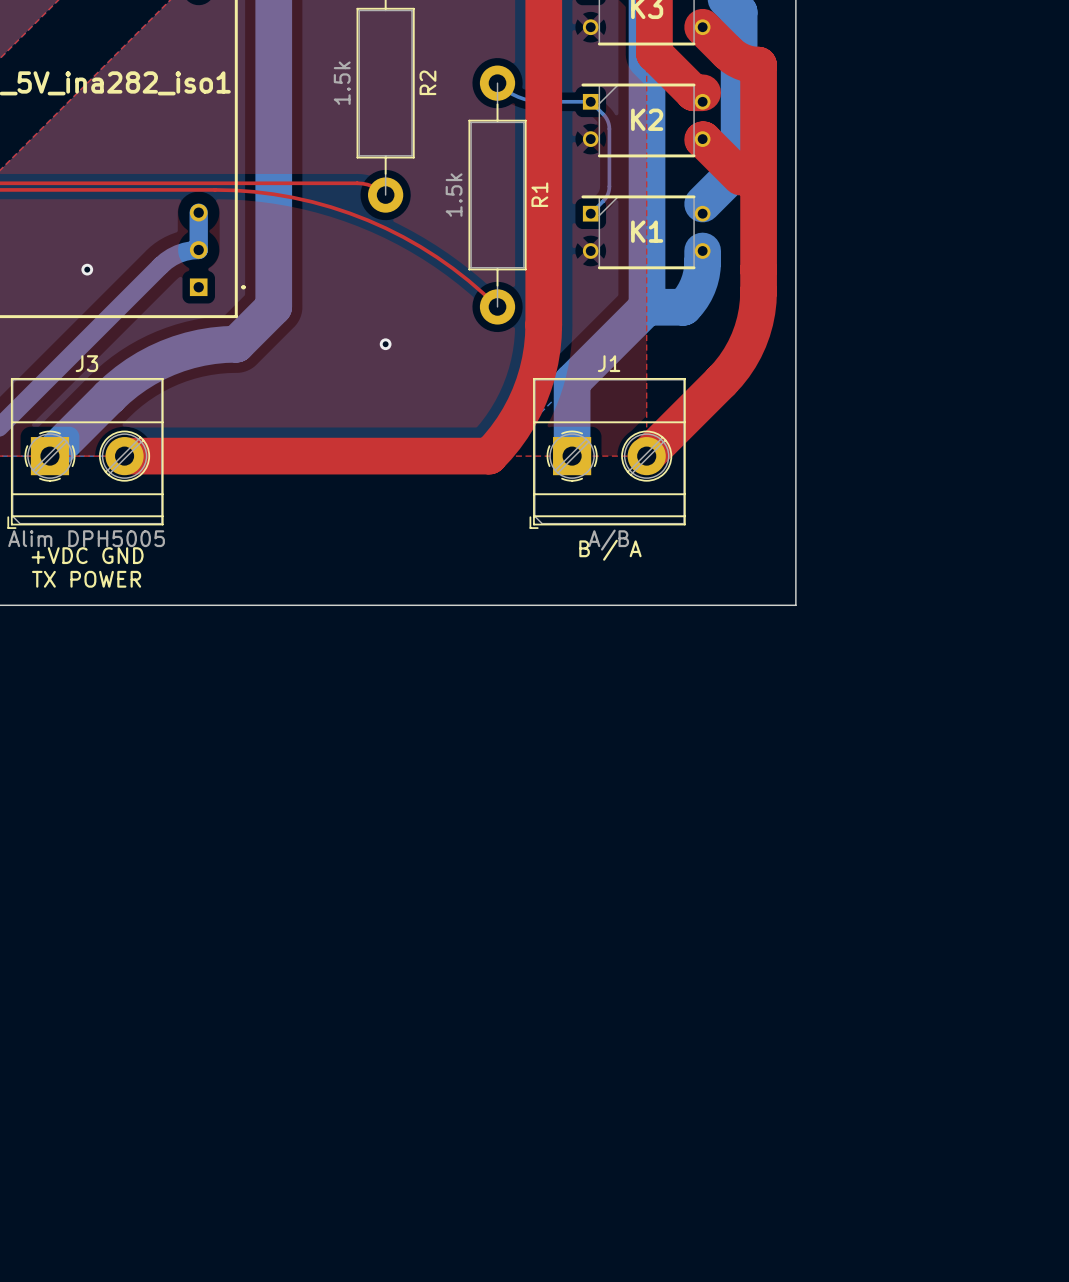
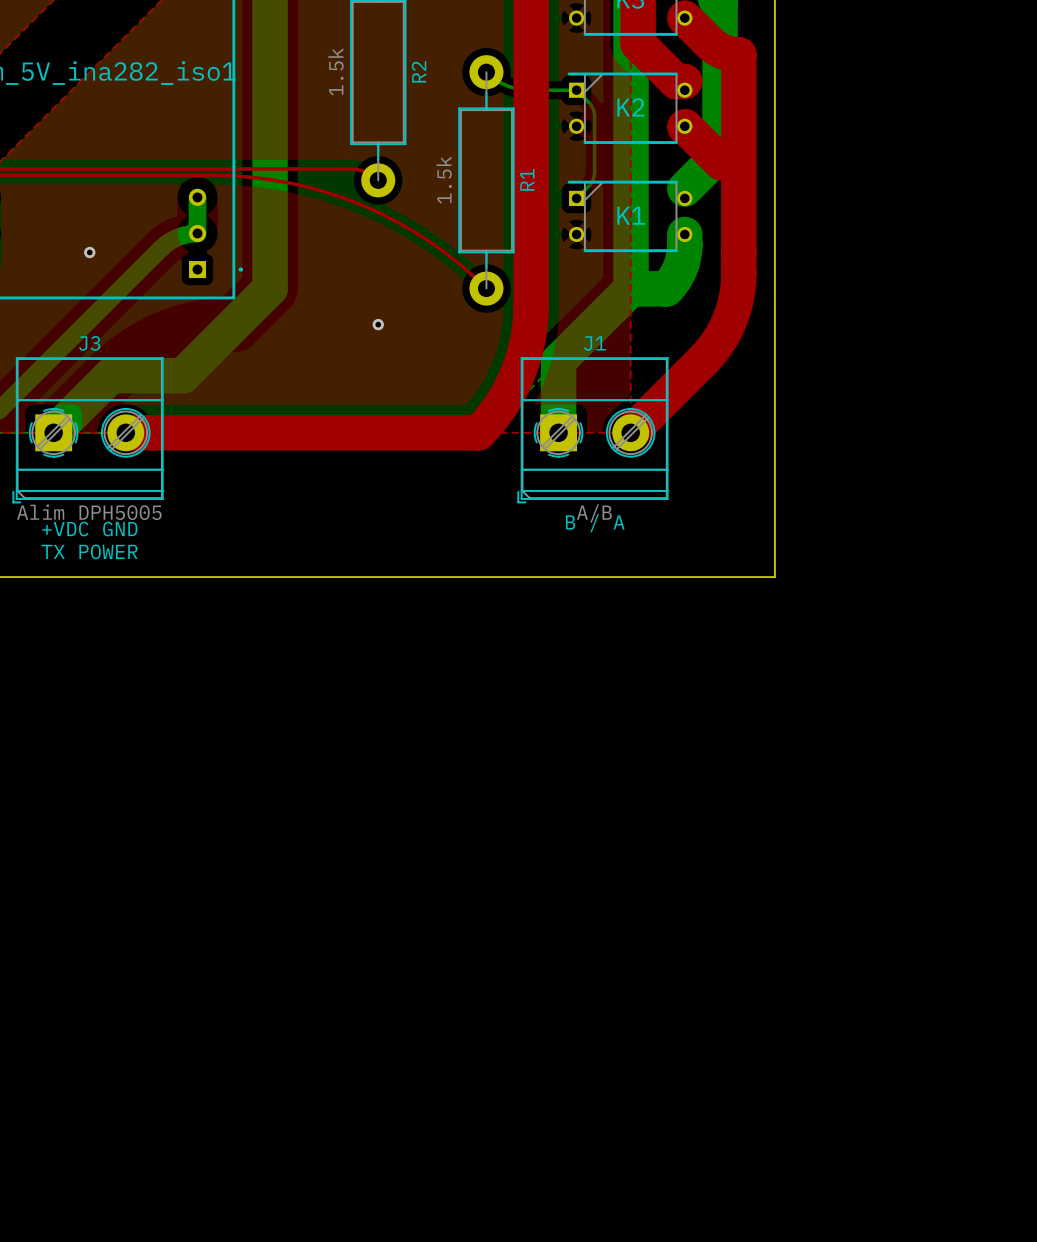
bottom track: (236, 344) (201, 347) (167, 357) (136, 374) (109, 396) -> (234, 324) (183, 375) (110, 375)

